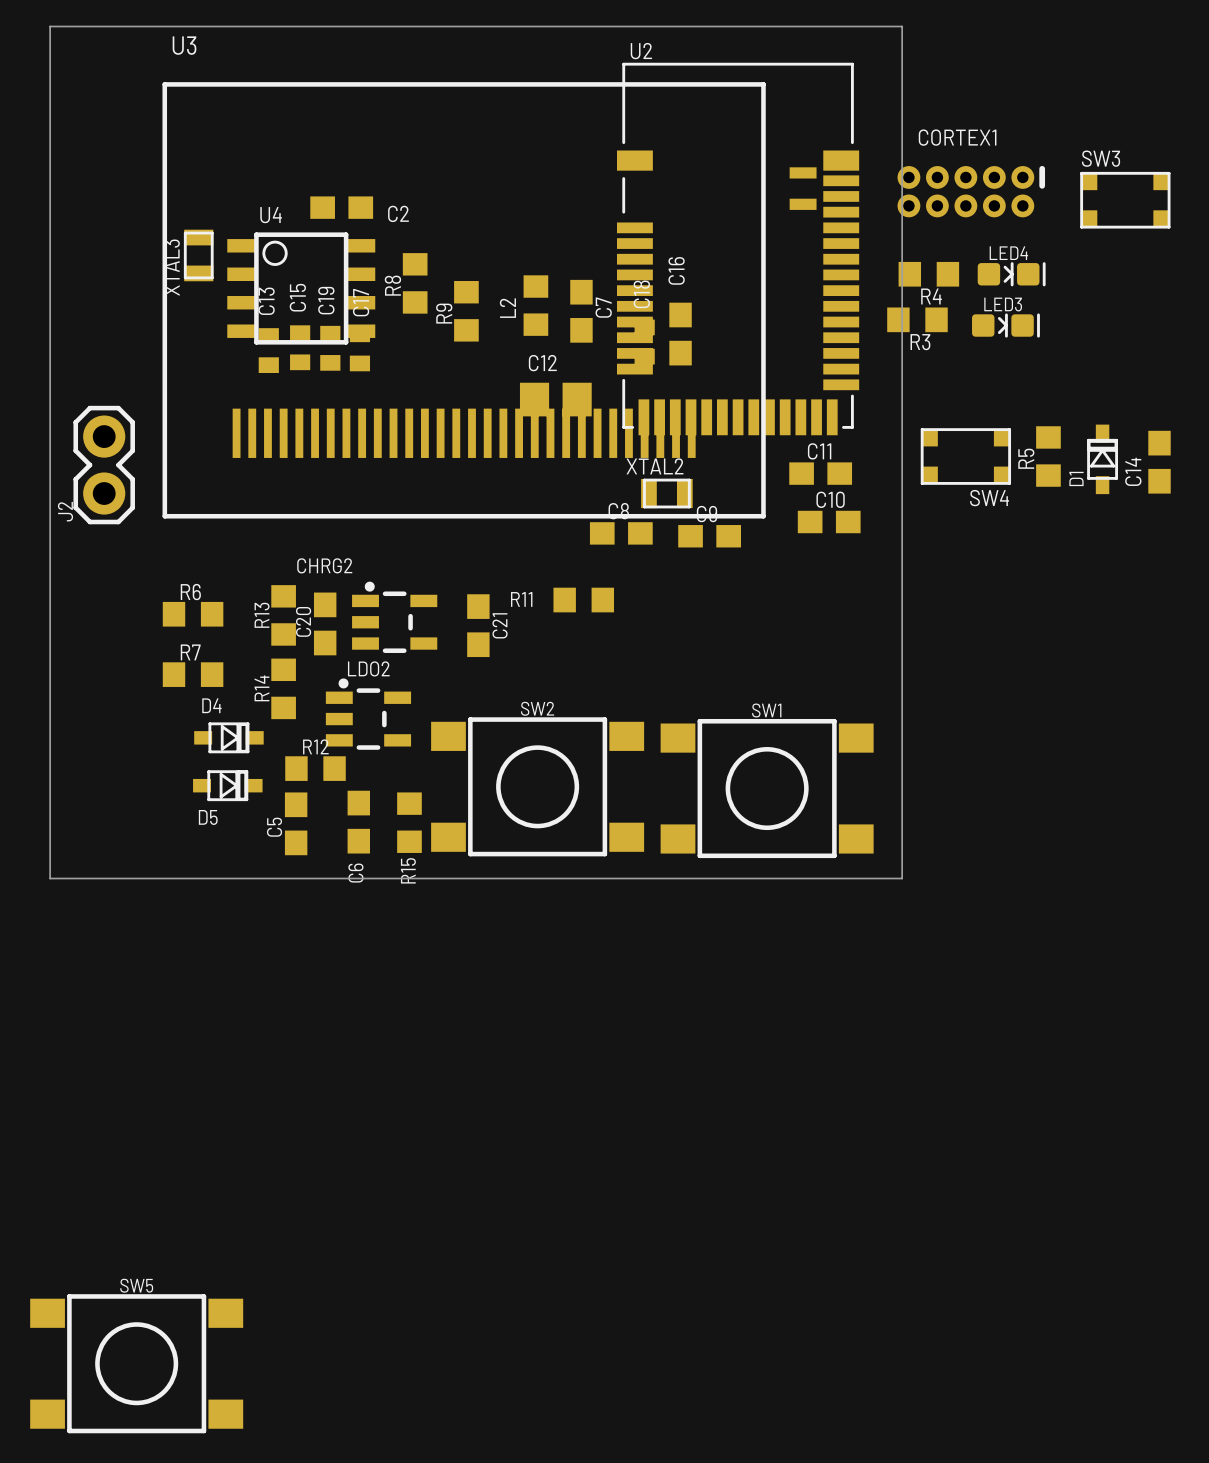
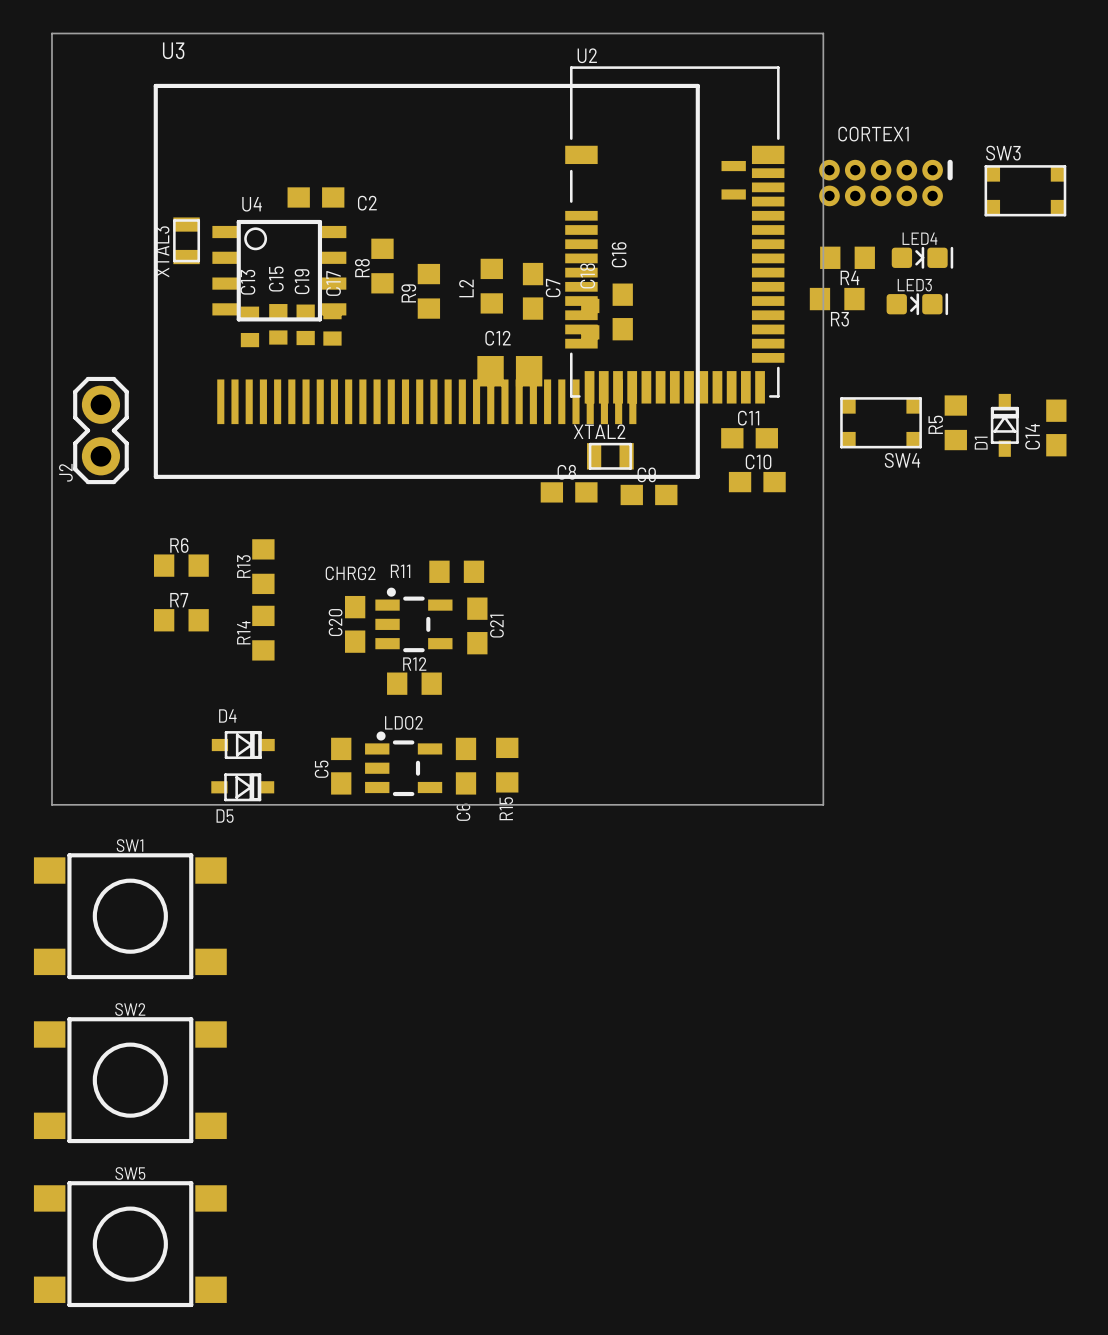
R11 position: (583, 600) -> (456, 571)
CHRG2 position: (394, 617) -> (413, 619)
C20 position: (325, 623) -> (355, 624)
C21 position: (478, 625) -> (477, 625)
LDO2 position: (368, 714) -> (403, 763)
D4 position: (228, 737) -> (243, 745)
R12 position: (315, 768) -> (414, 683)
D5 position: (227, 785) -> (242, 787)
SW2 position: (537, 786) -> (130, 1080)
SW1 position: (767, 788) -> (130, 916)
C6 position: (358, 822) -> (466, 766)
R15 position: (409, 822) -> (507, 765)
C5 position: (296, 823) -> (341, 766)

